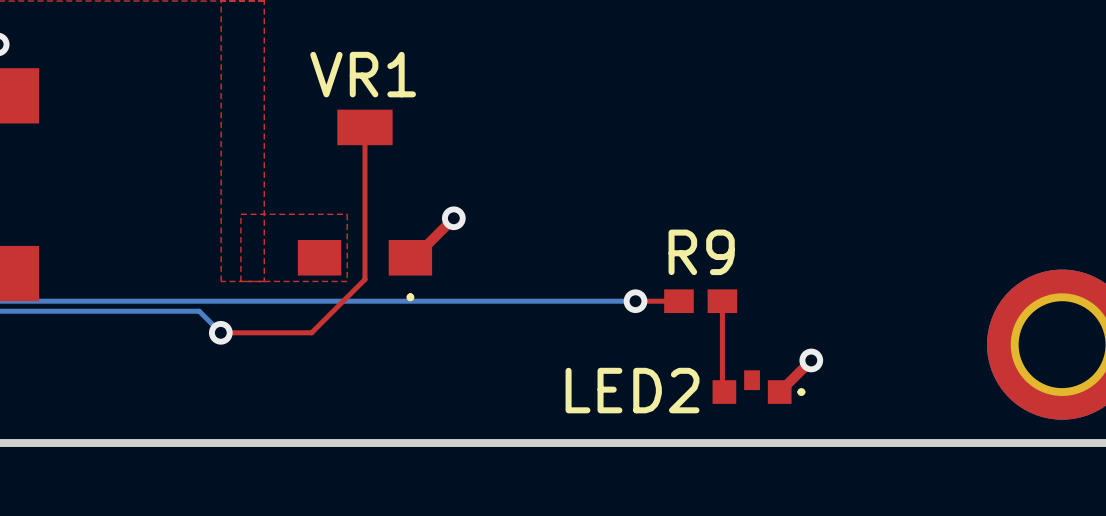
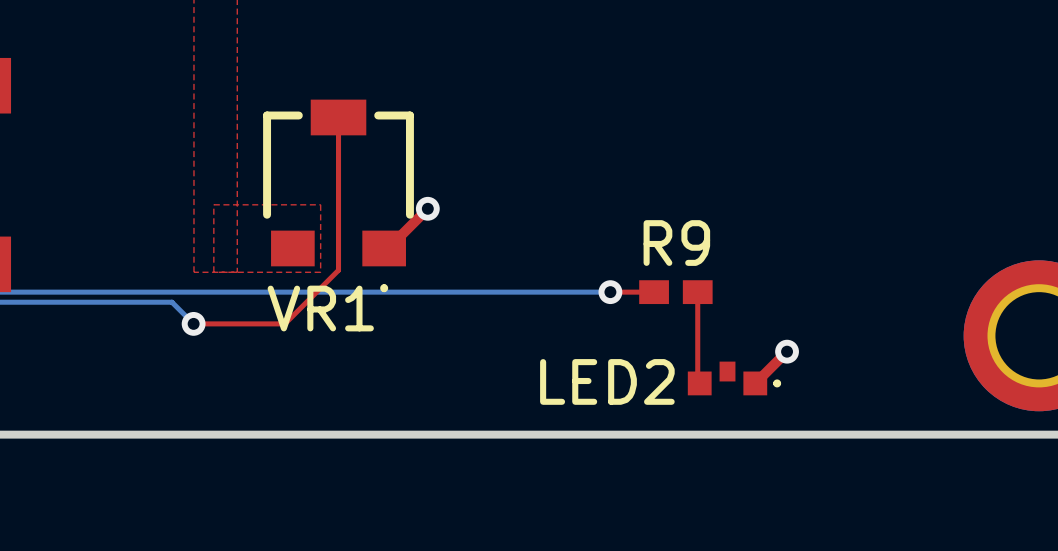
VR1 name position: VR1 (363, 74) -> VR1 (320, 308)
VR1 footprint: [297, 109, 433, 302] -> [263, 99, 414, 293]

